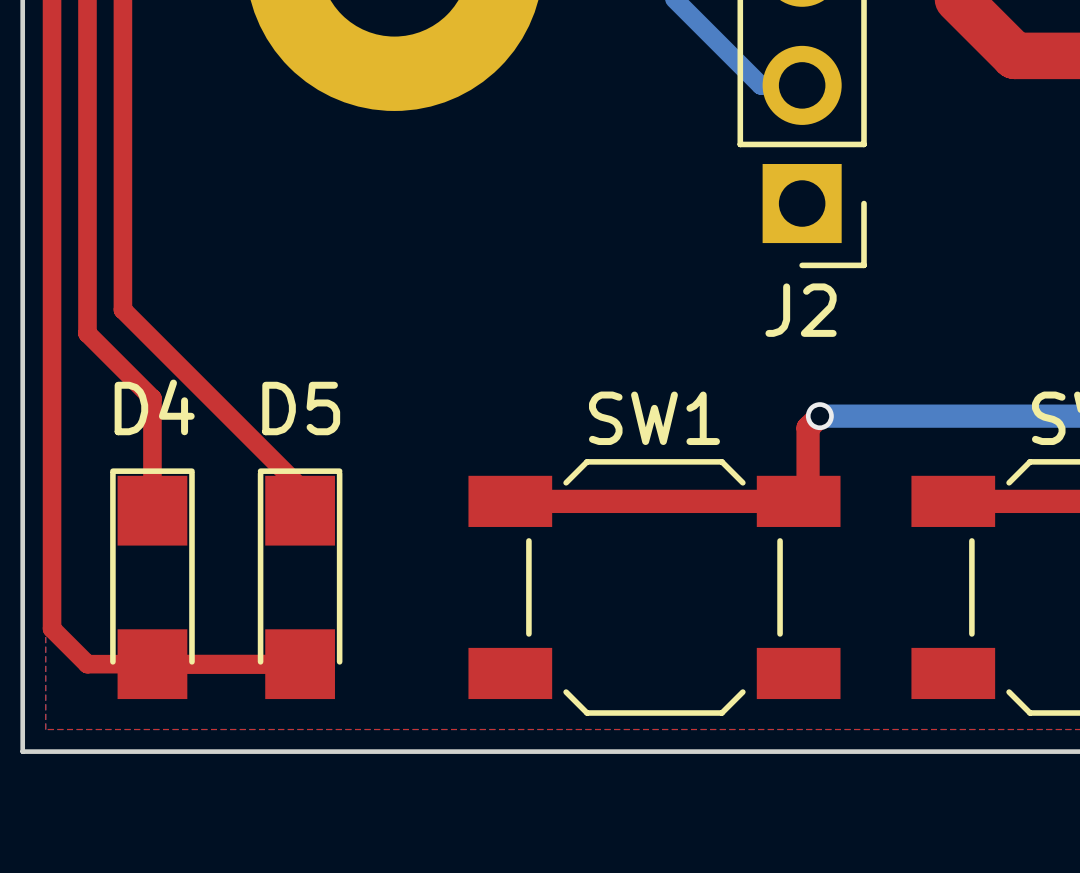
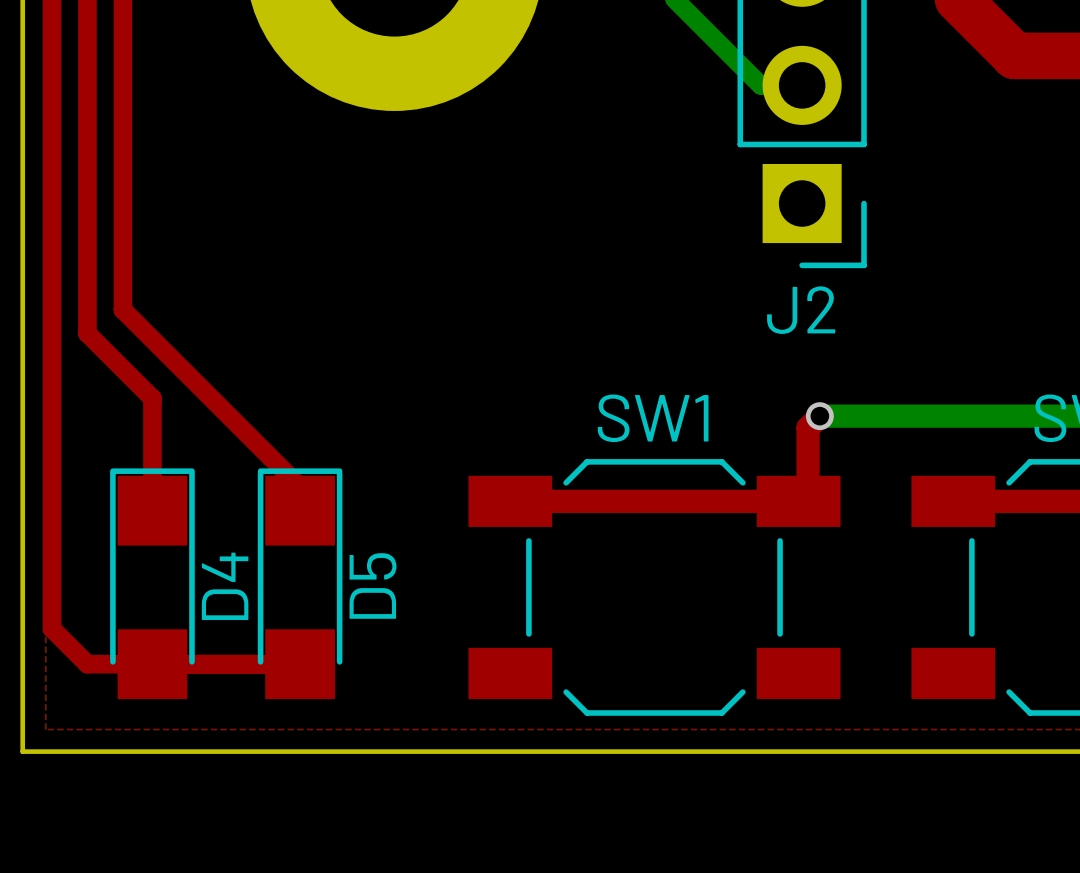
D4 name rotation: 0° (154, 407) -> 90° counterclockwise (225, 586)
D4 name position: D4 (154, 407) -> D4 (225, 586)
D5 name rotation: 0° (301, 408) -> 90° counterclockwise (373, 585)
D5 name position: D5 (301, 408) -> D5 (373, 585)

